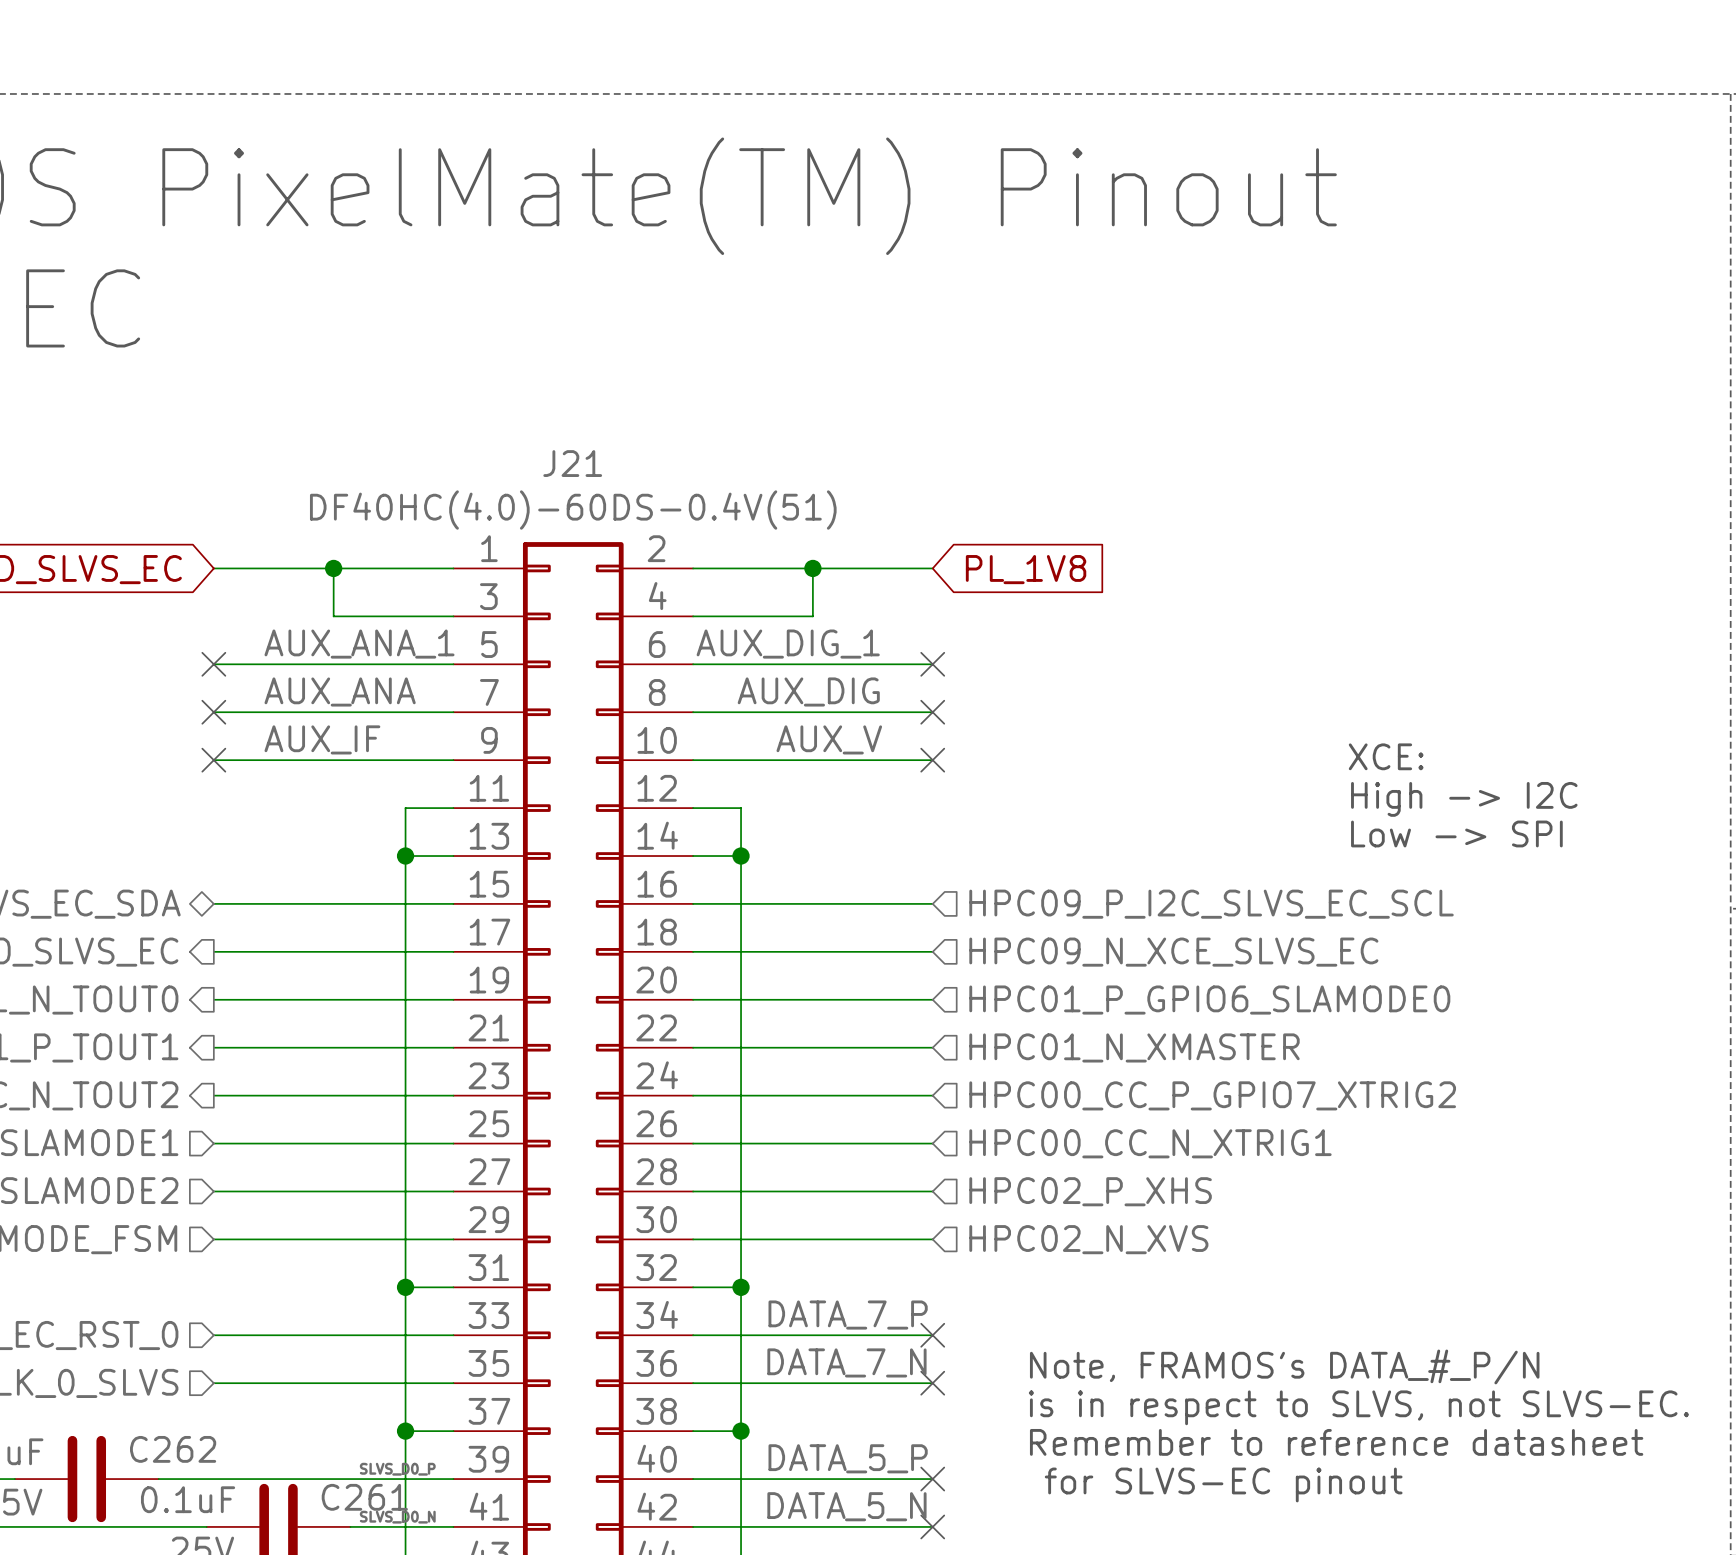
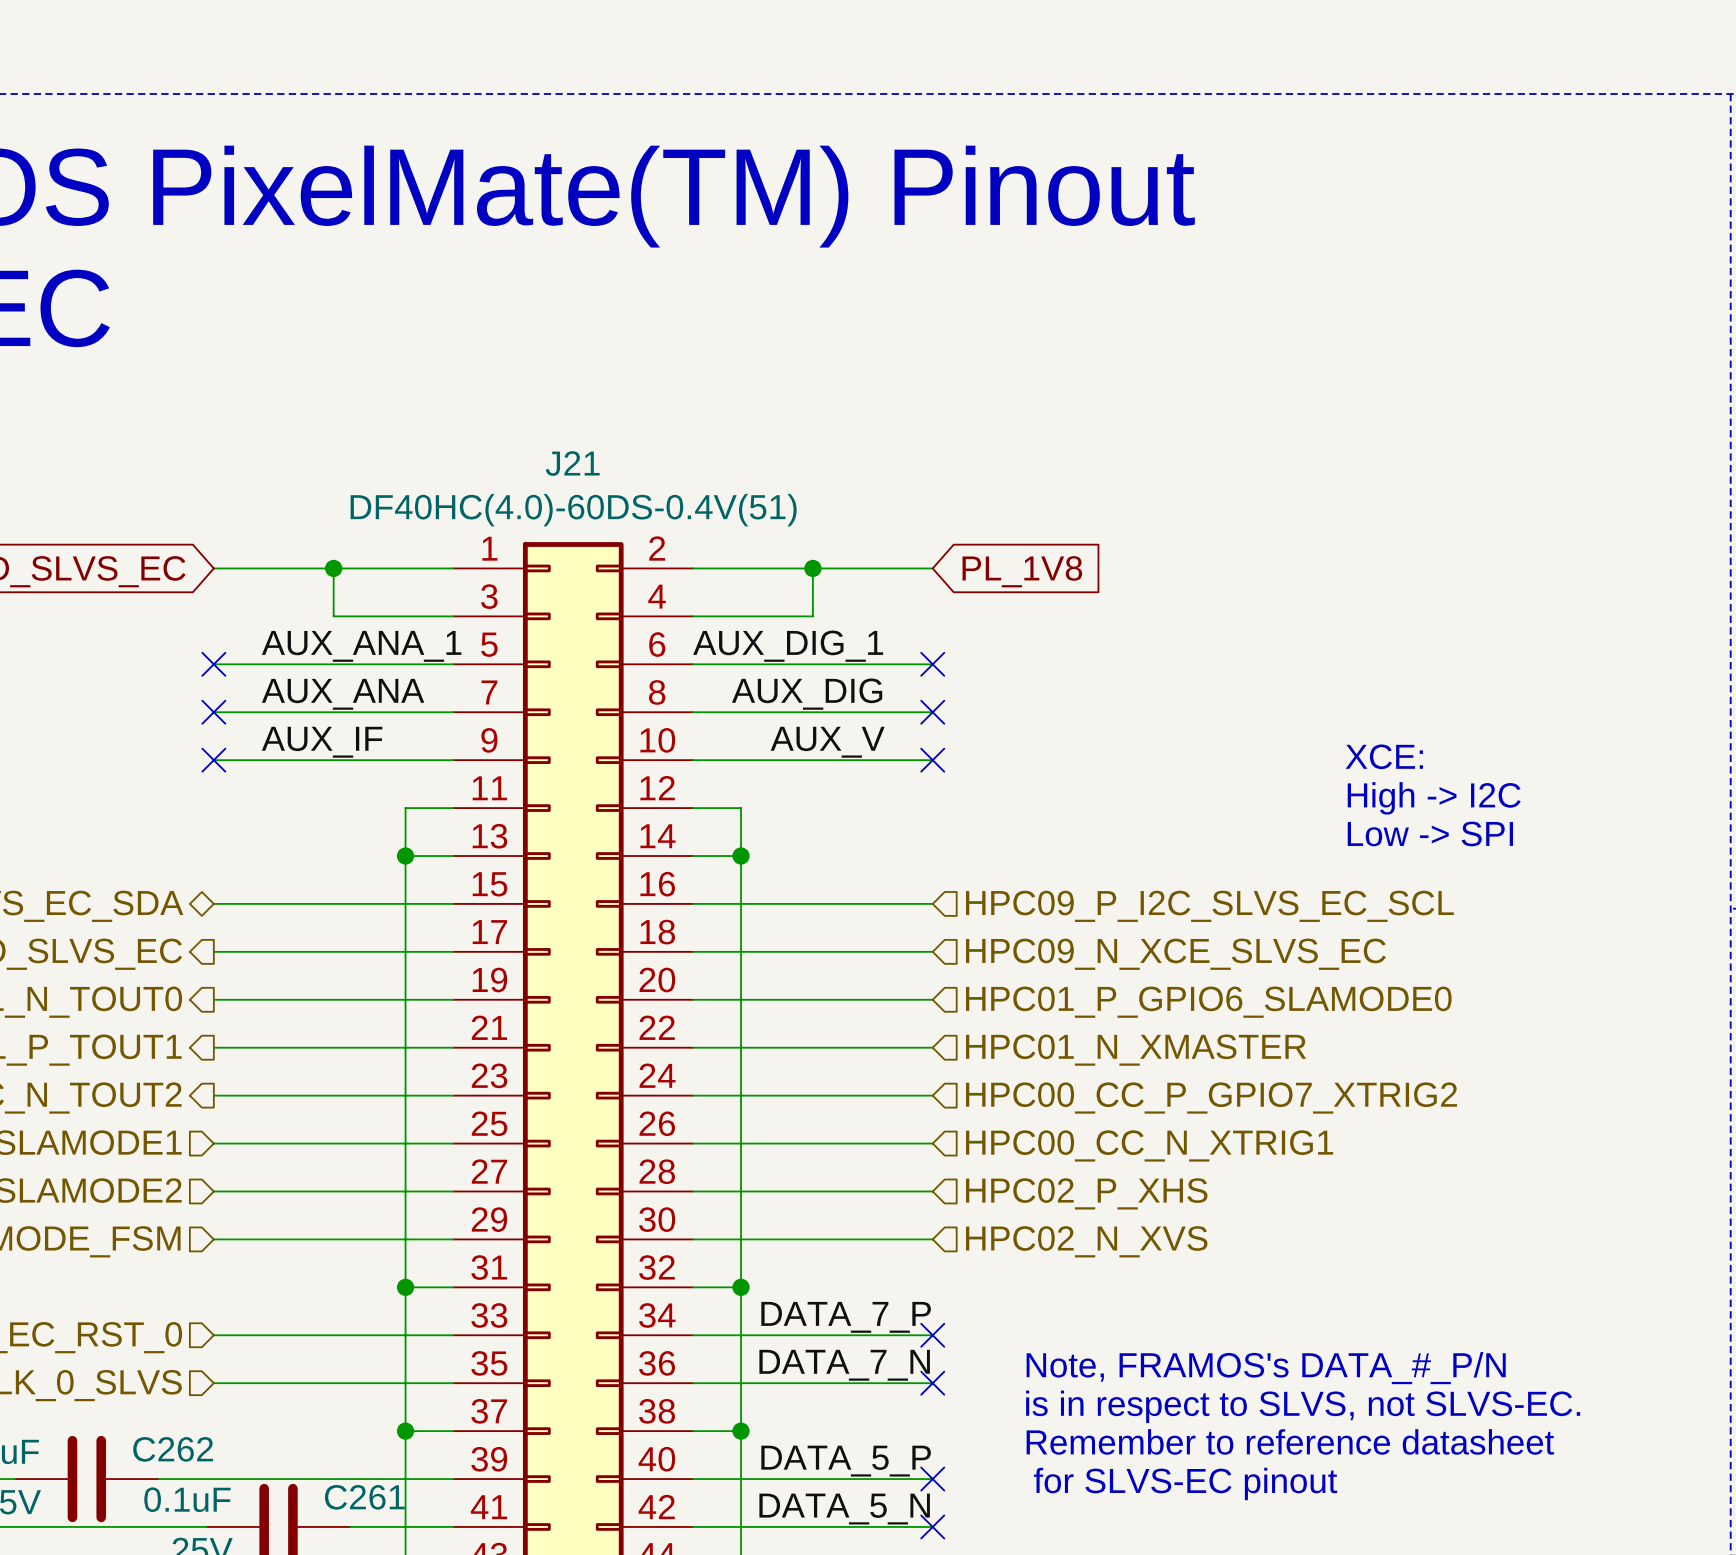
label: SLVS_D0_P (397, 1469) -> none
label: SLVS_D0_N (397, 1517) -> none

